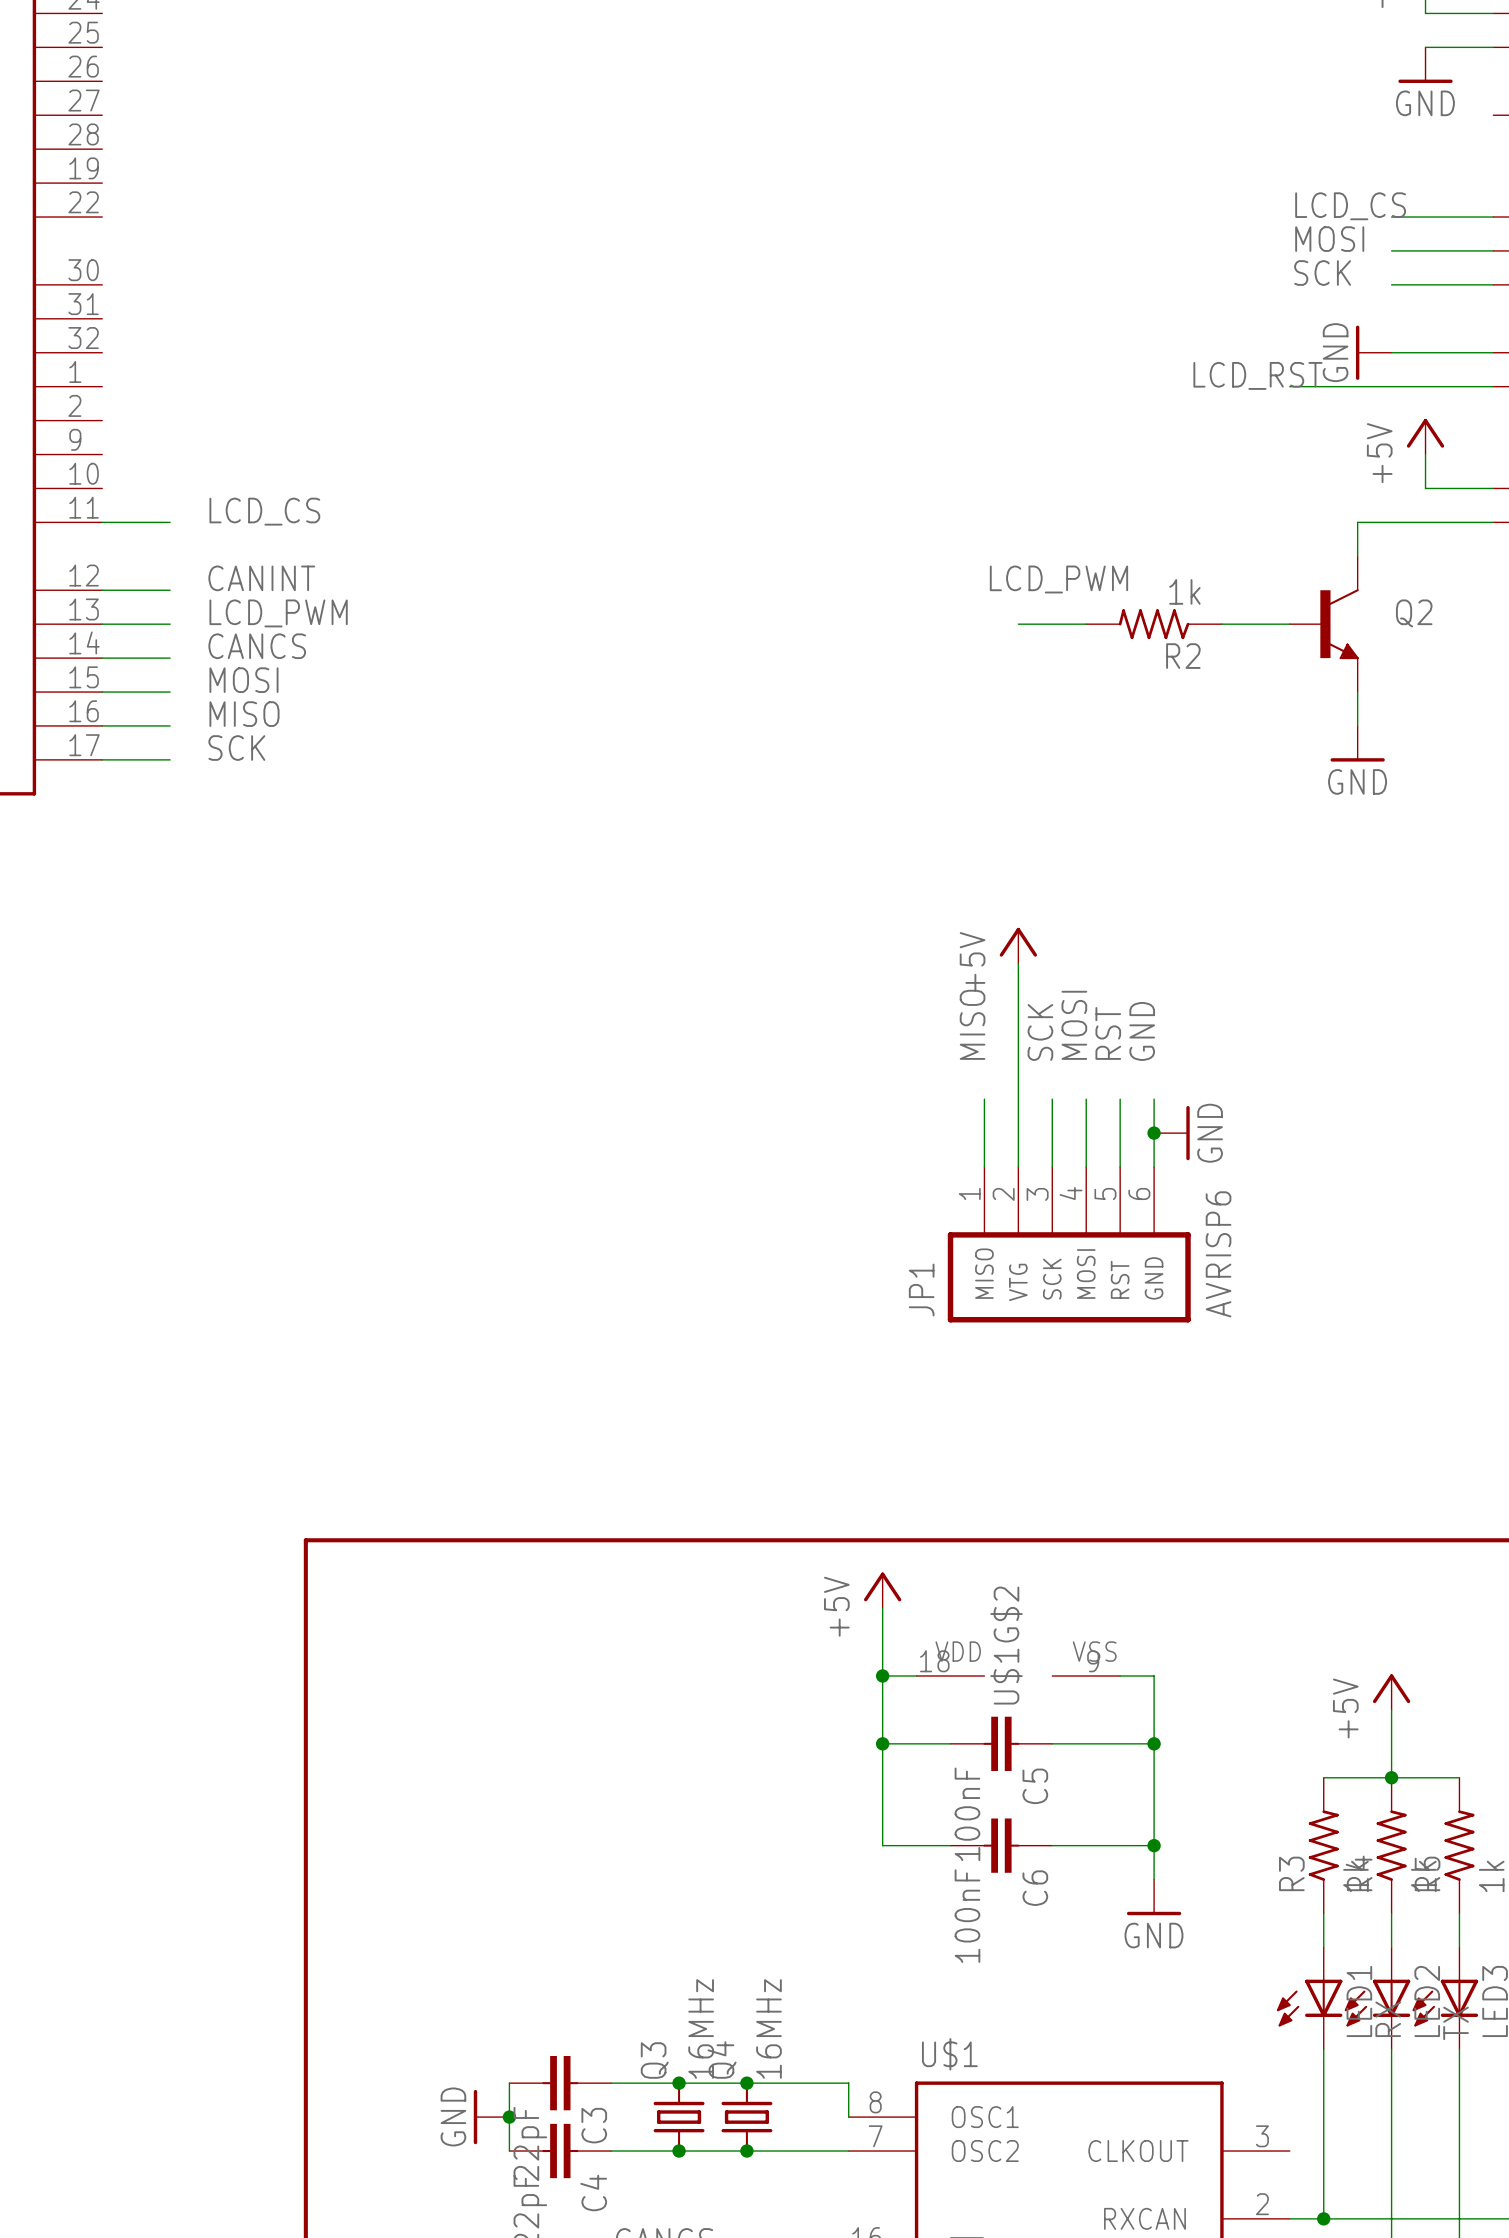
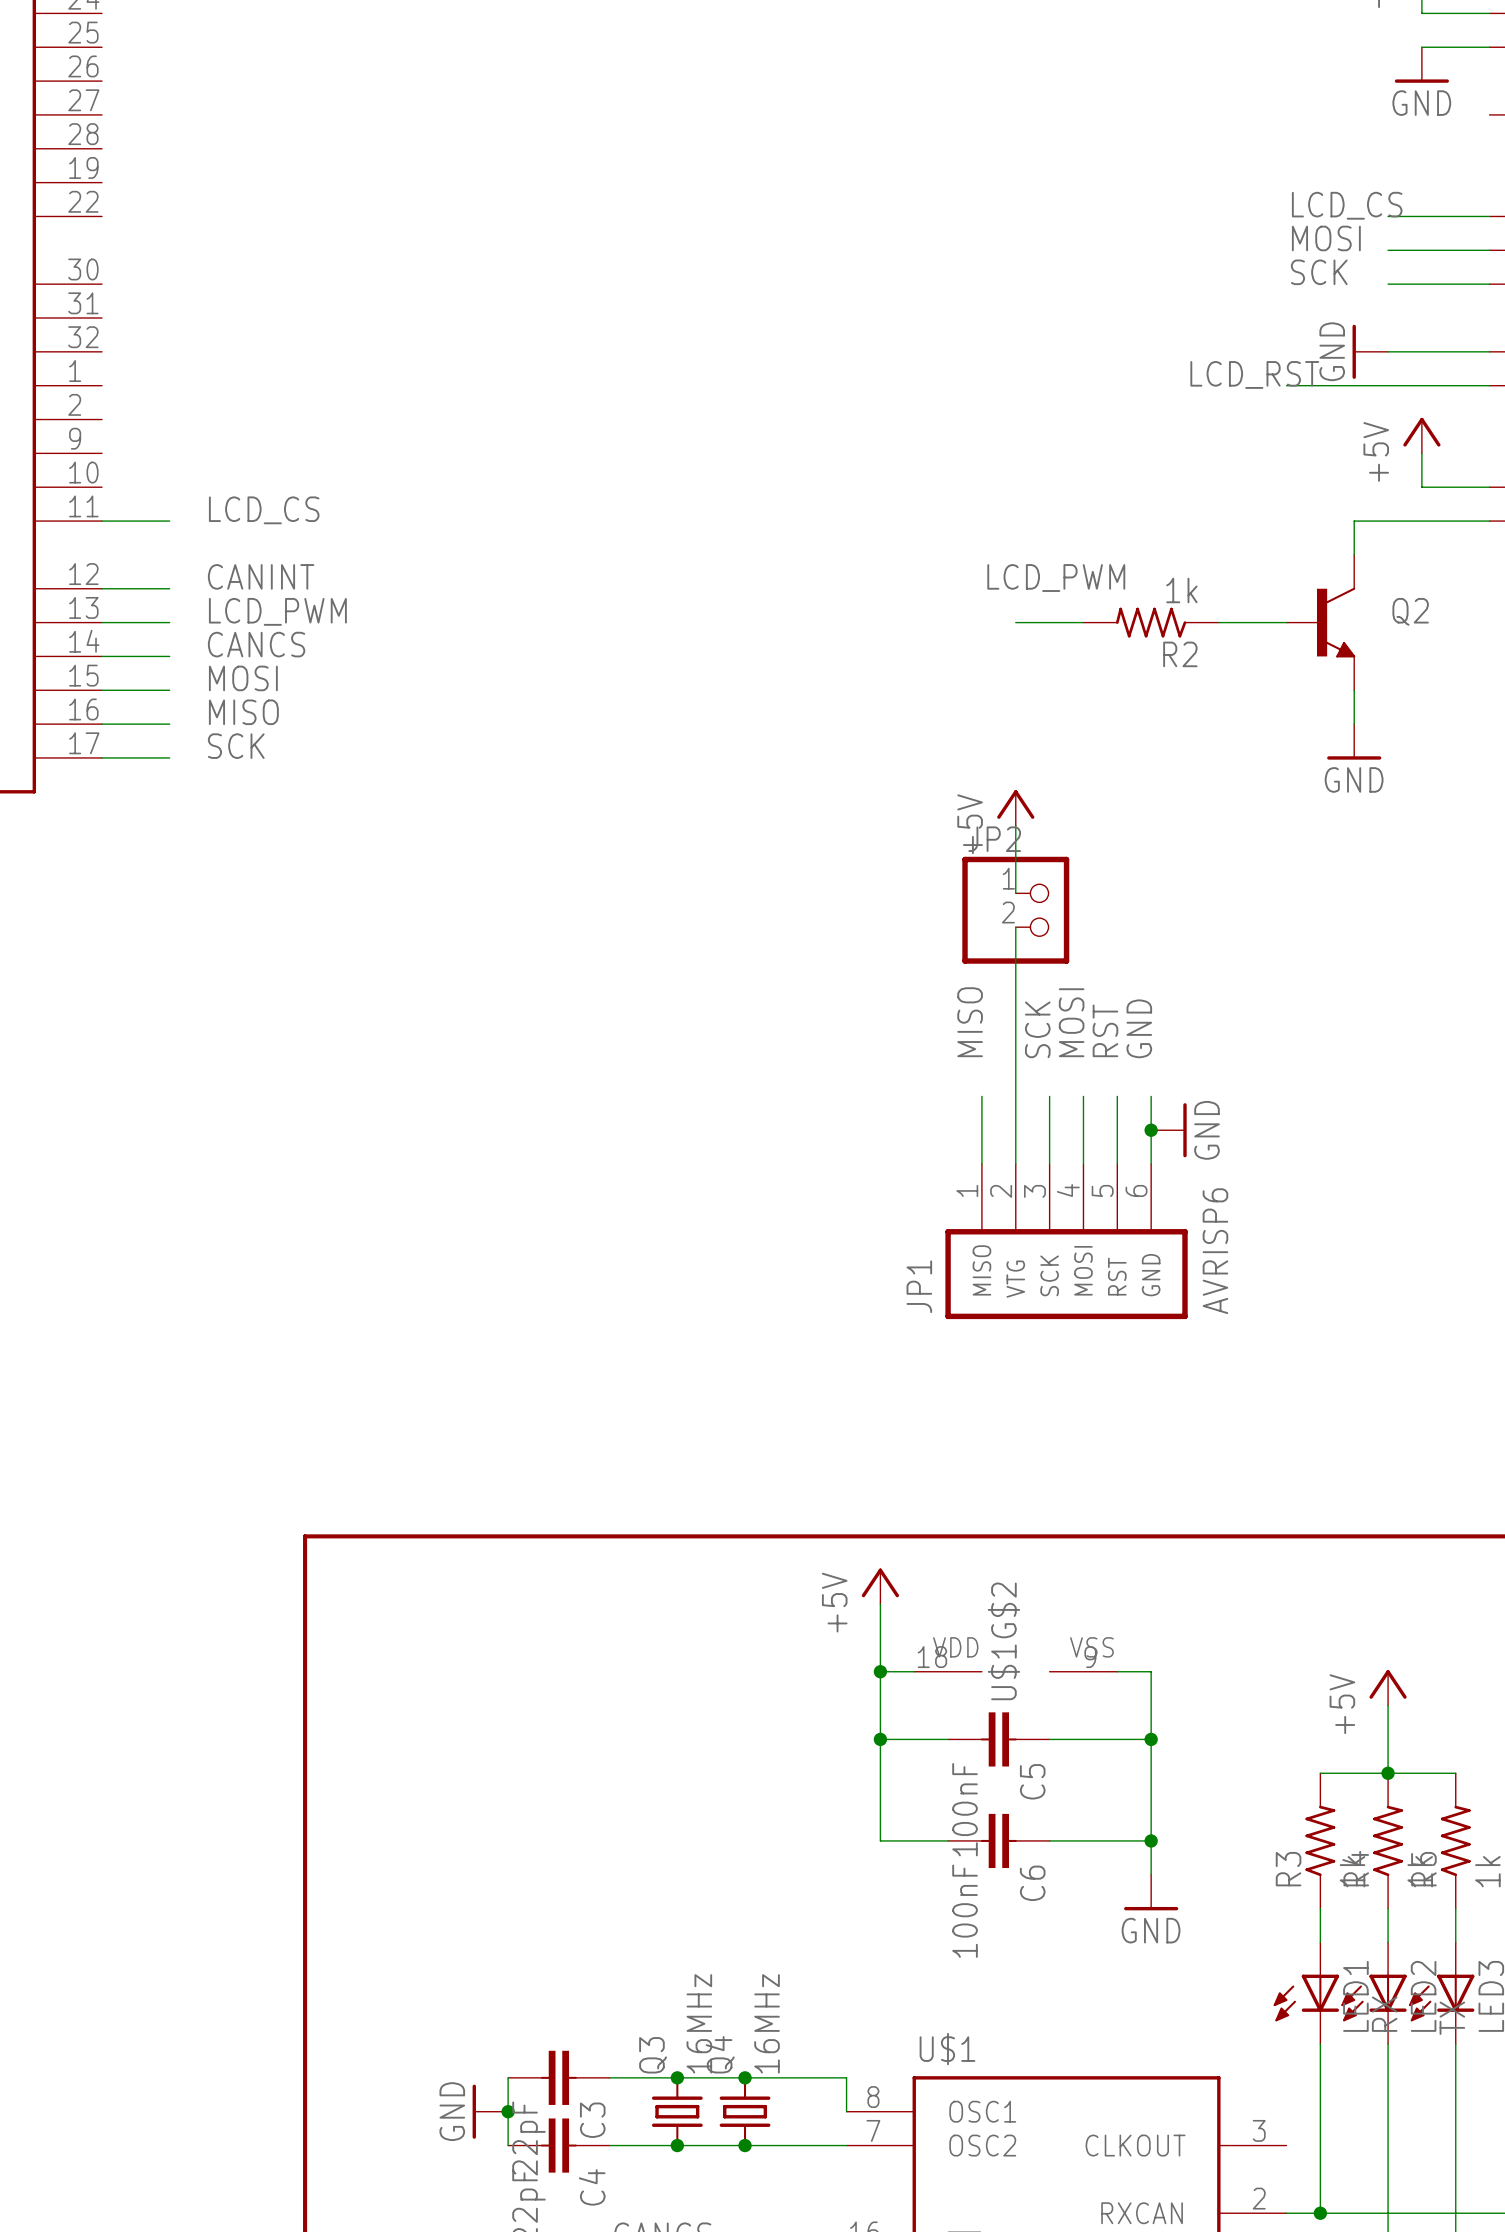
wire: none -> (1015, 825) (1015, 893)
JP2: none -> (1015, 910)
power symbol position: +5V (1018, 945) -> +5V (1015, 807)

